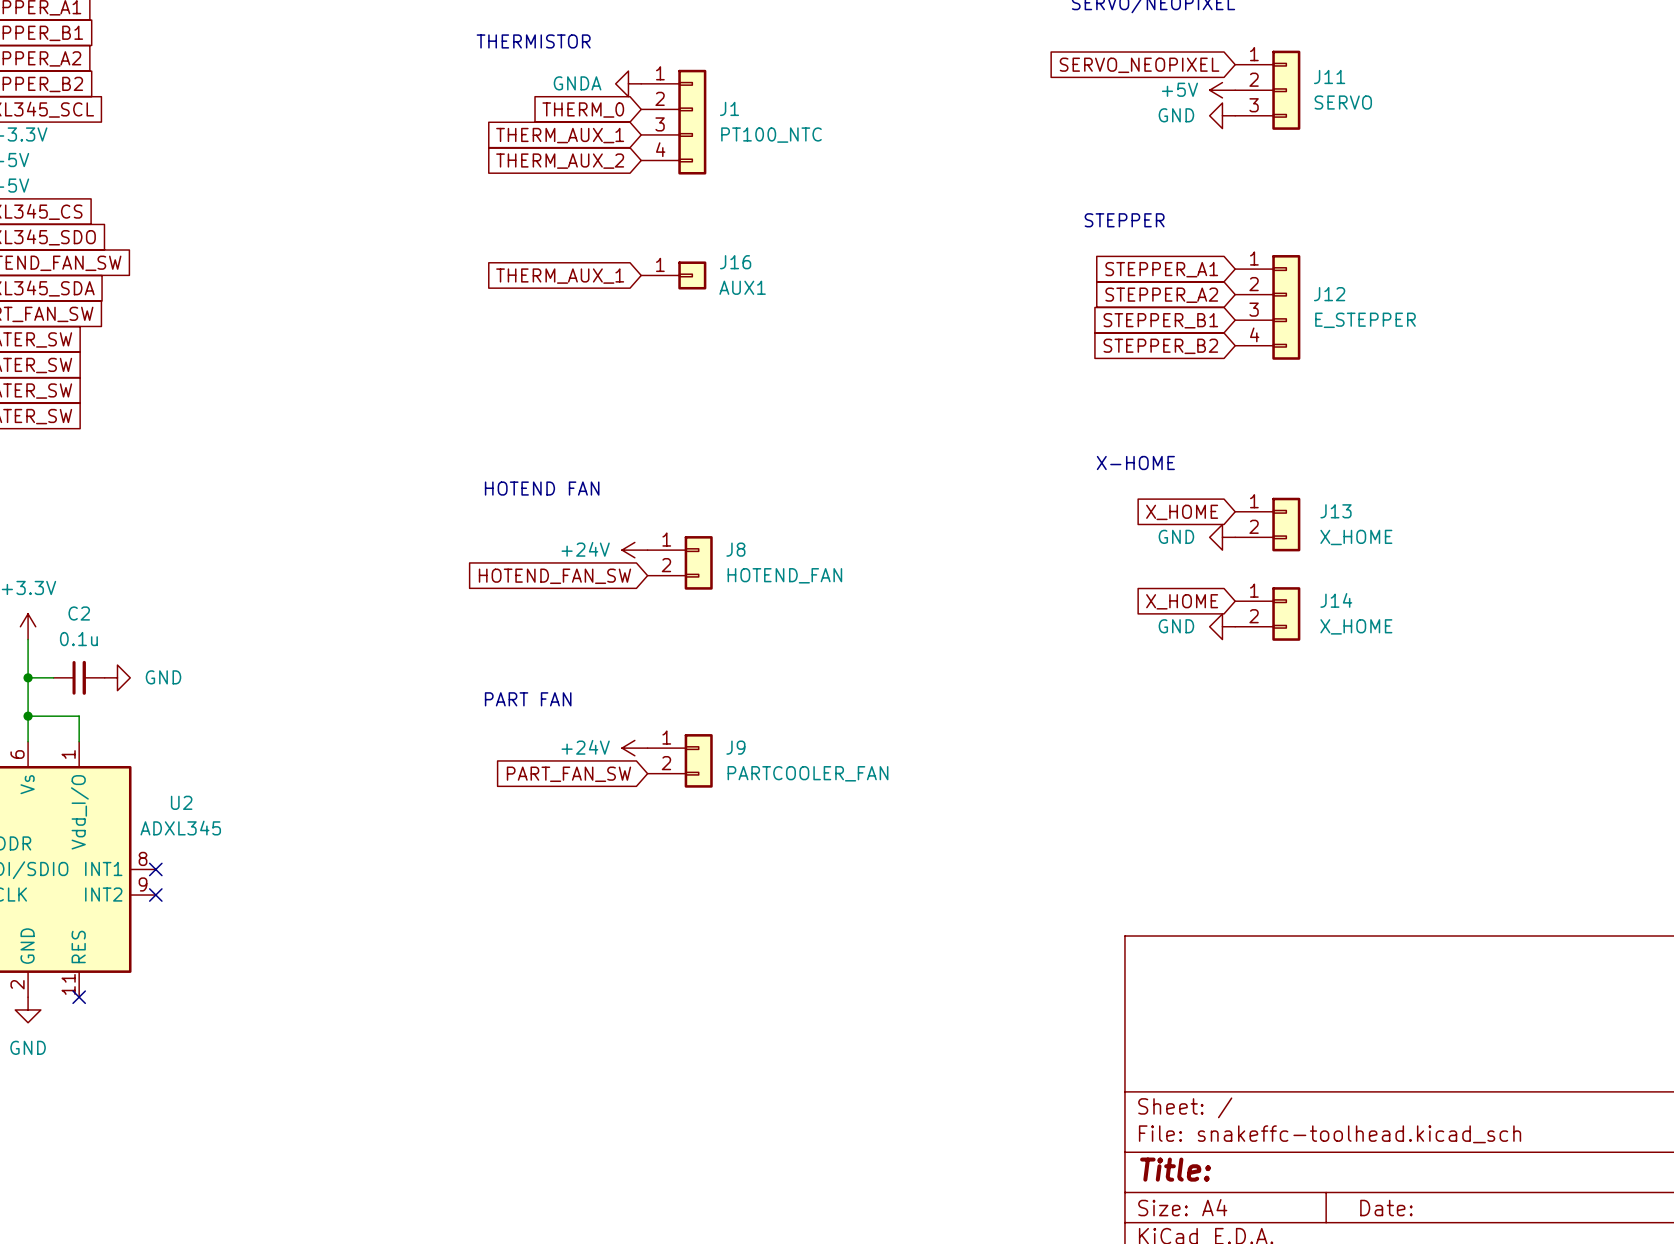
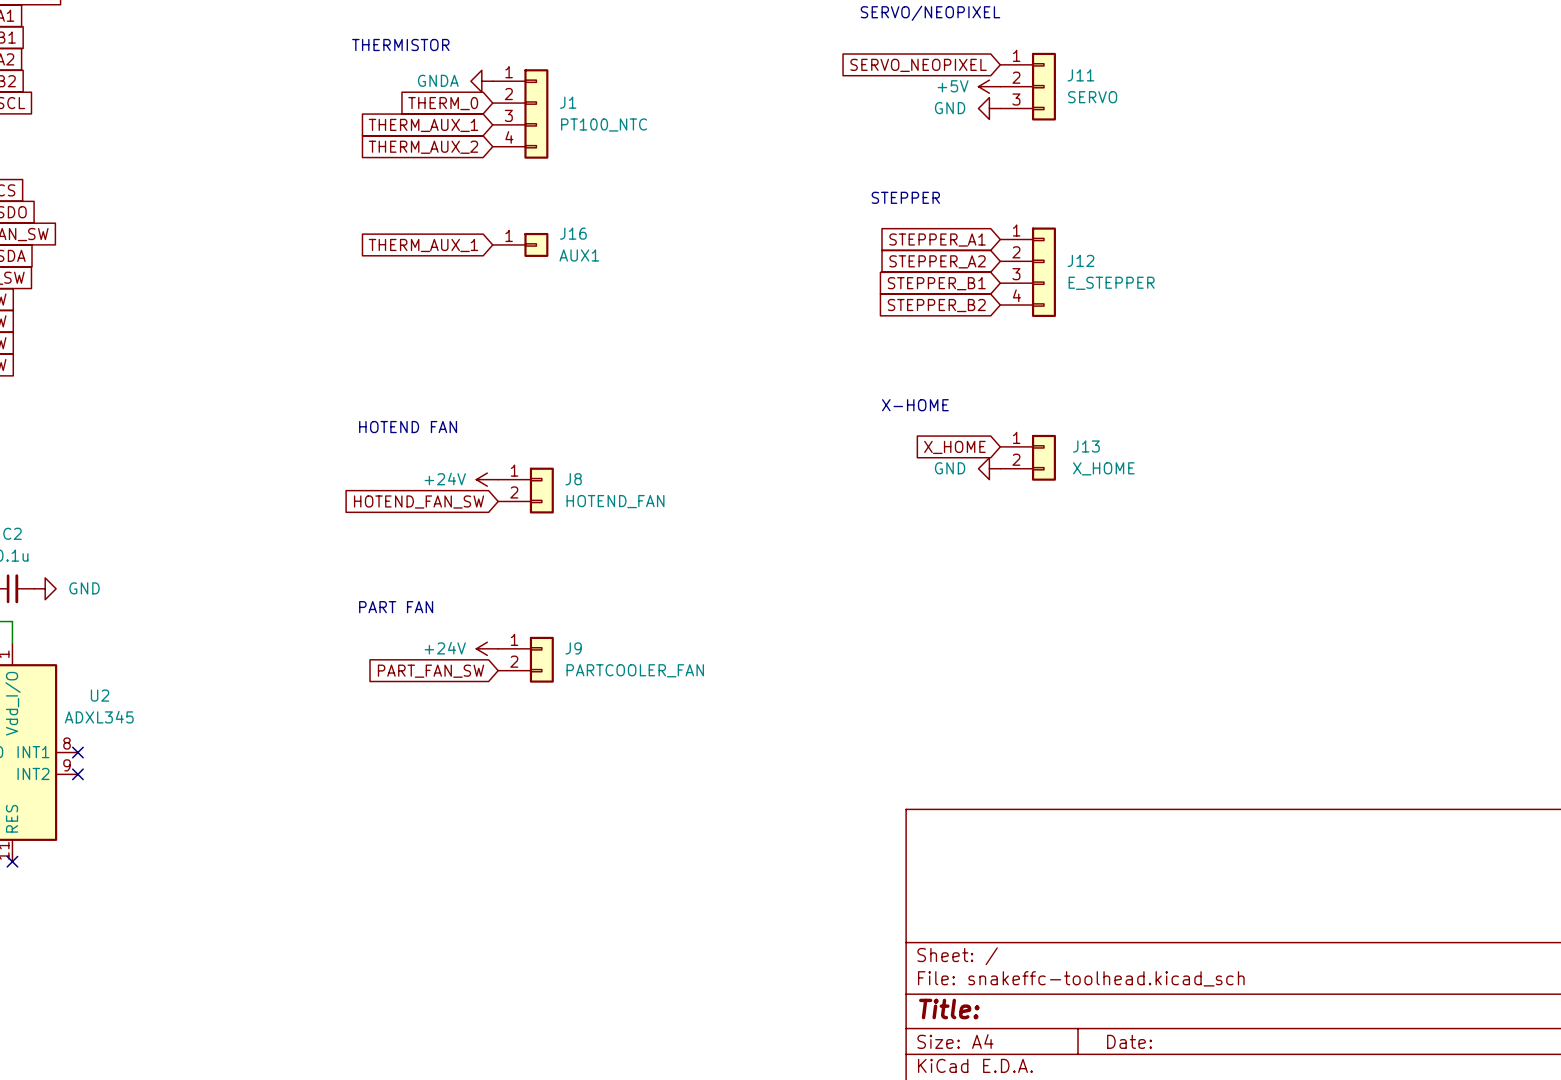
global label: X_HOME (1182, 601) -> none
J14: X_HOME (1267, 613) -> none
power symbol: GND (1222, 626) -> none

